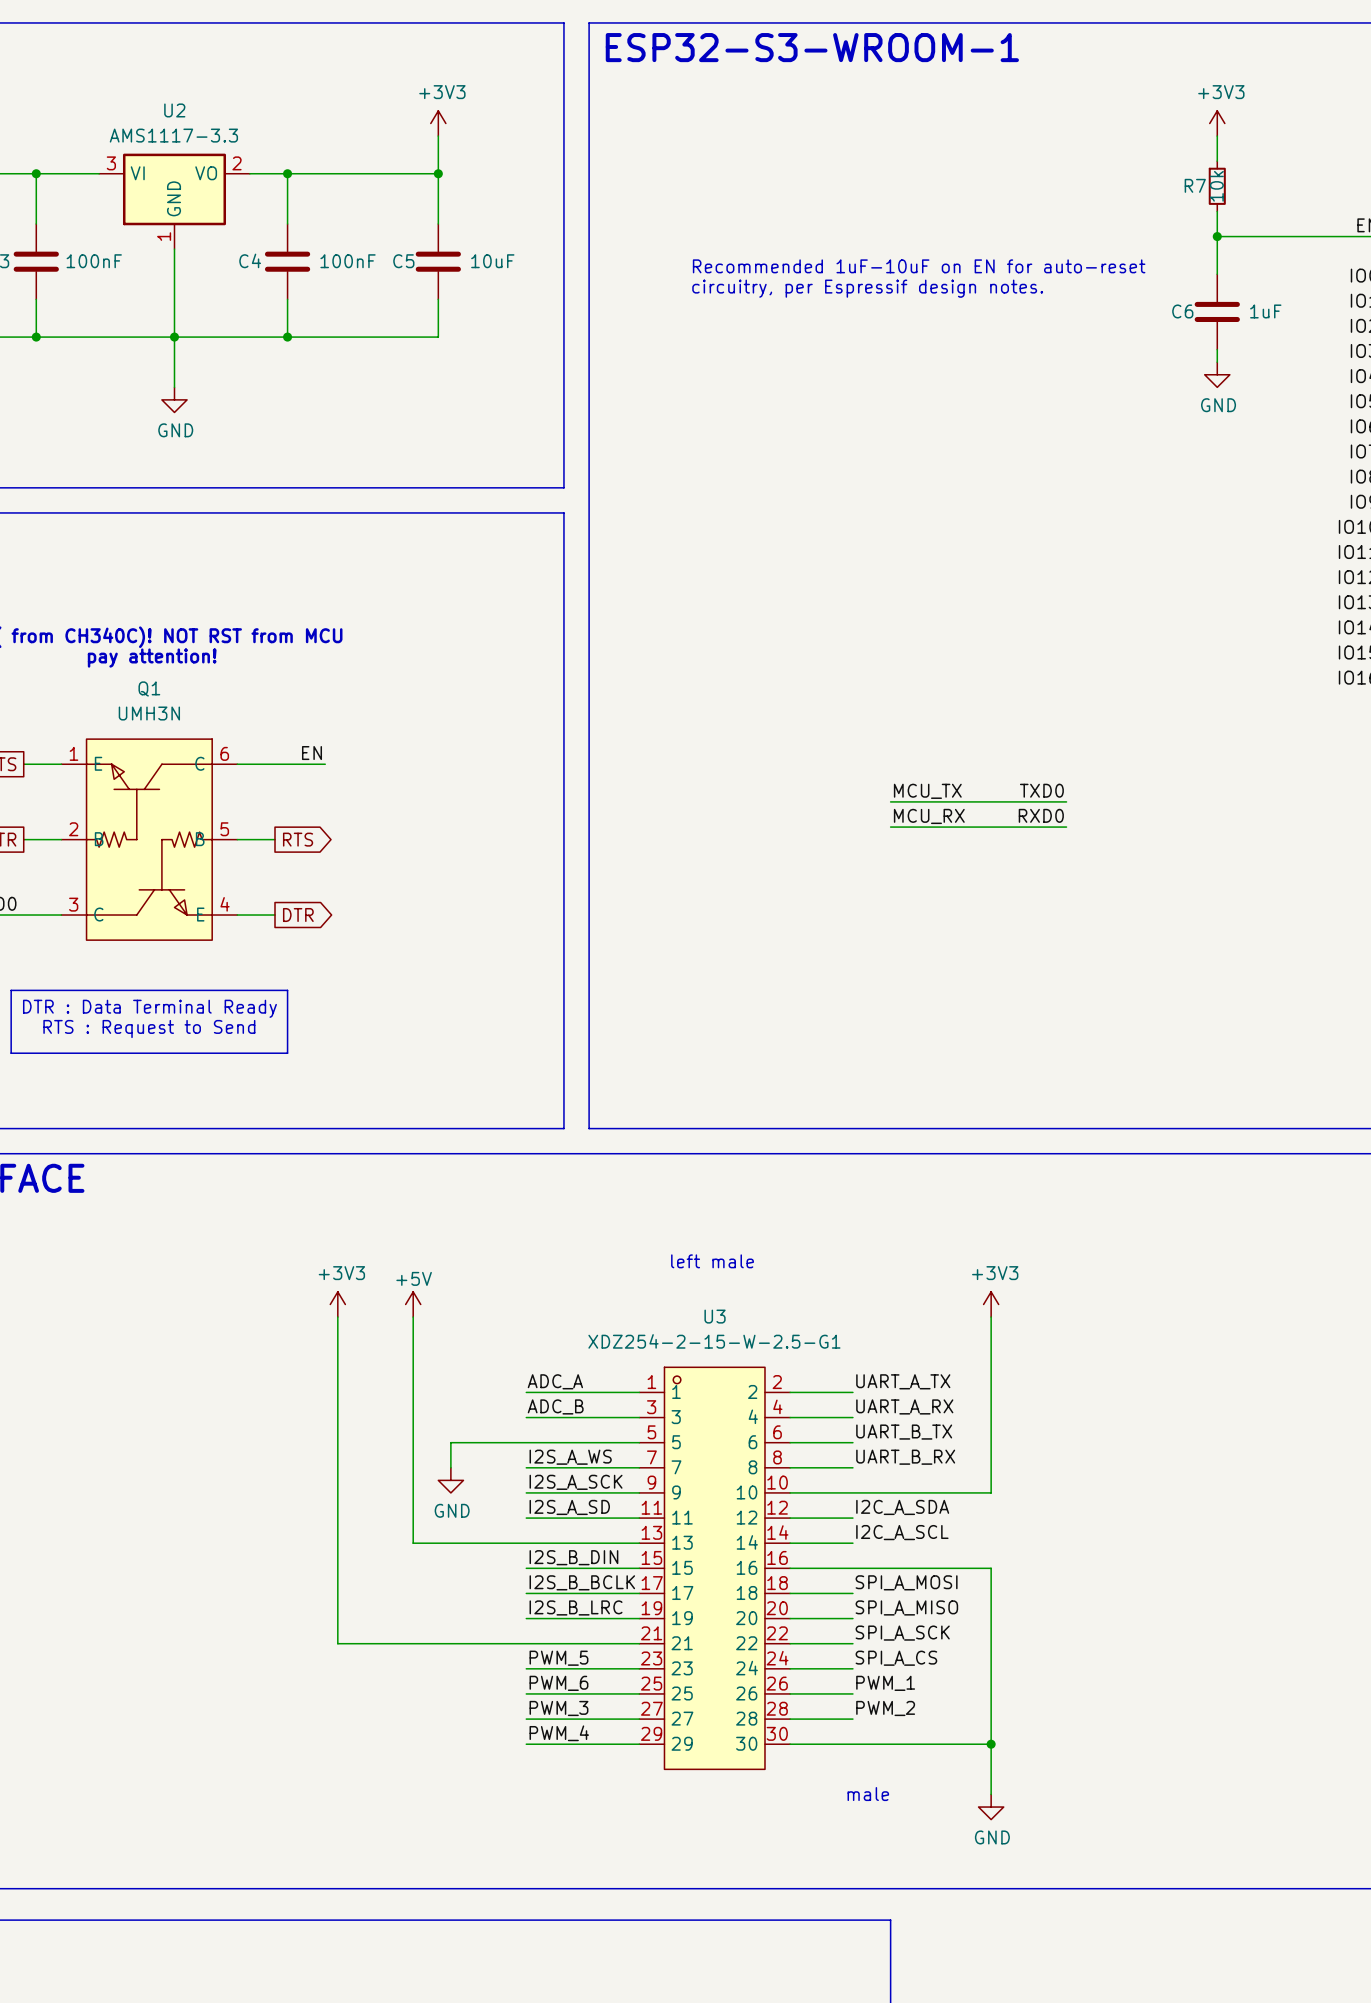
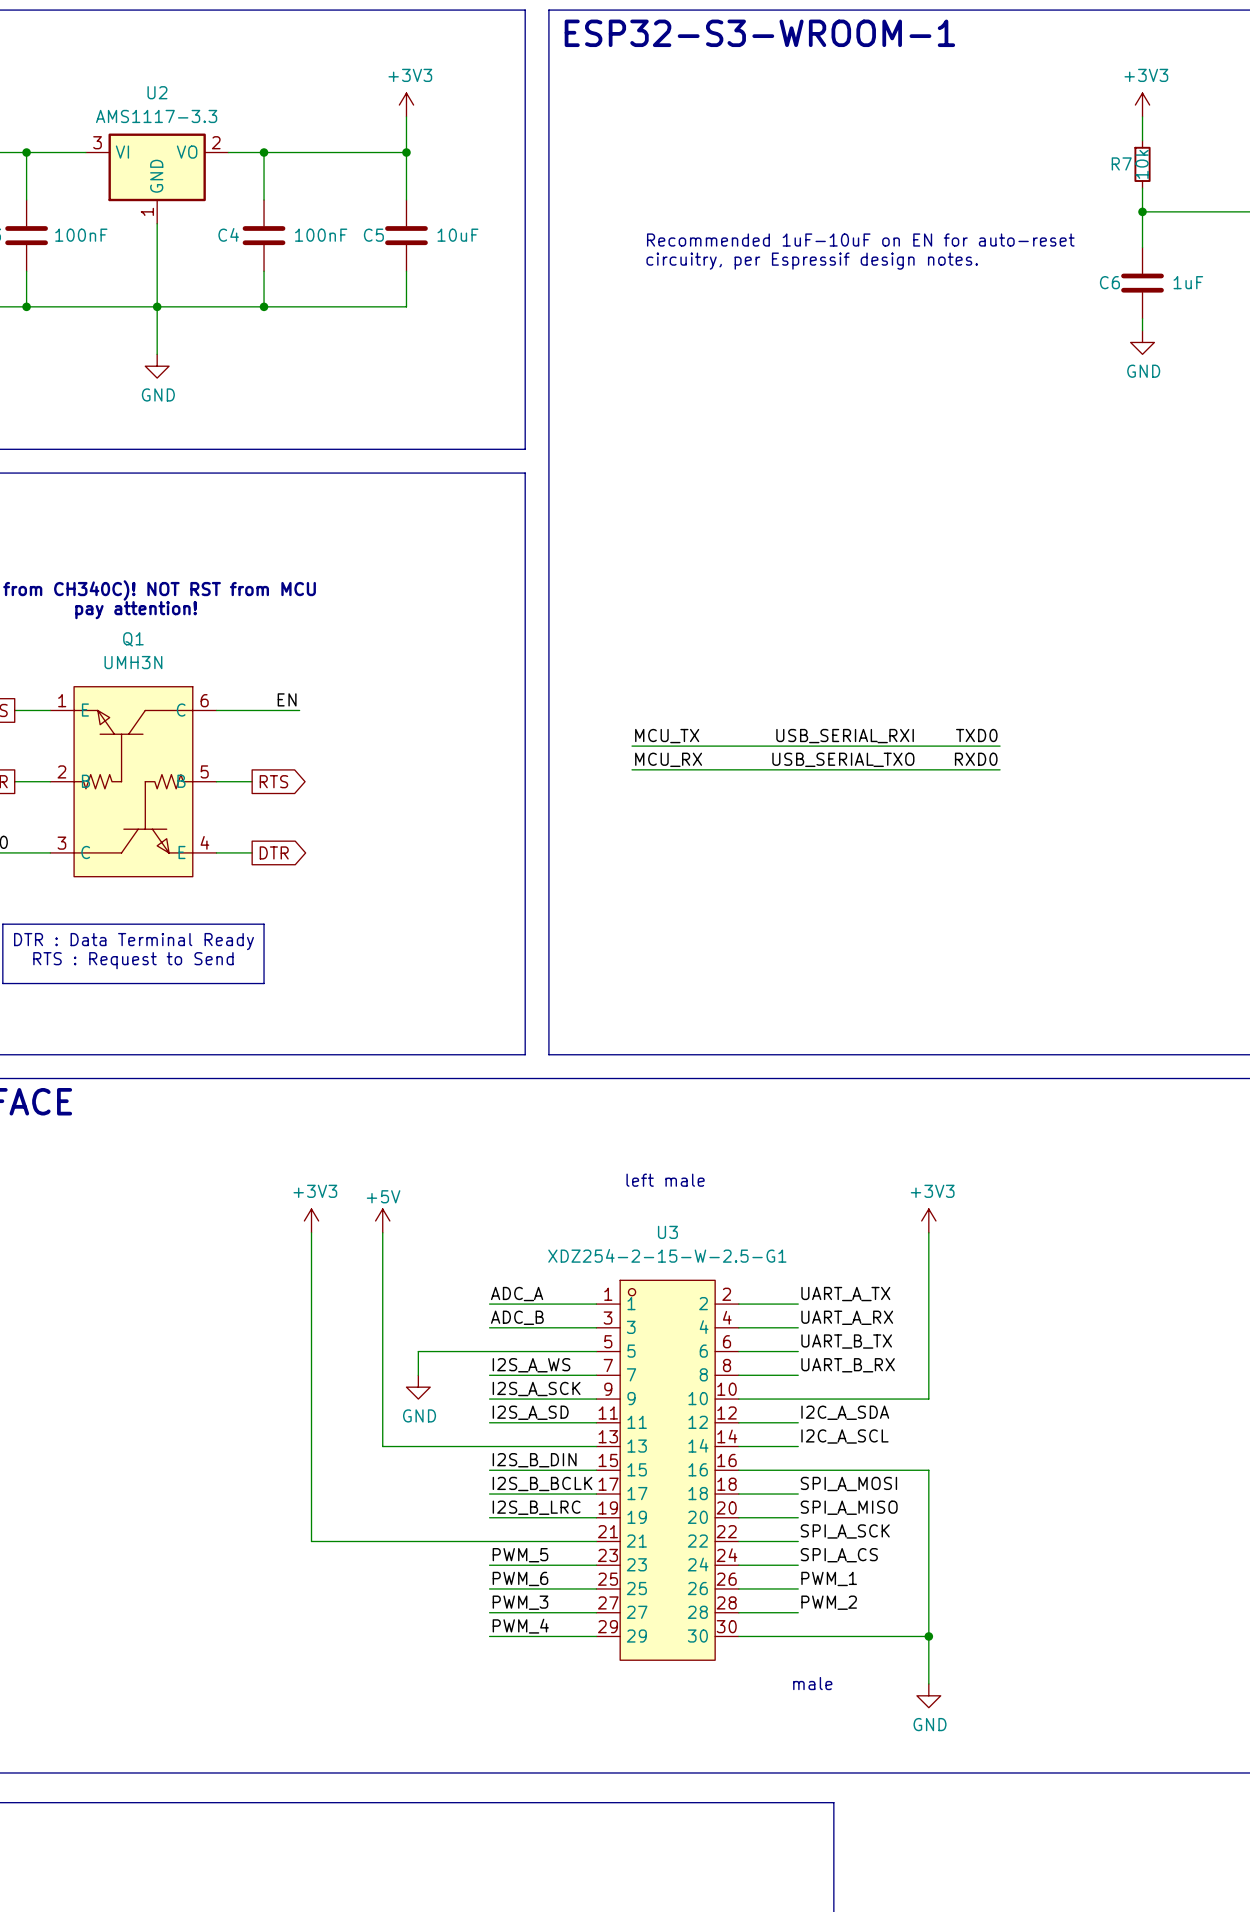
label: none -> USB_SERIAL_RXI (845, 736)
label position: MCU_TX (927, 791) -> MCU_TX (667, 736)
wire: none -> (632, 746) (833, 746)
label: none -> USB_SERIAL_TXO (843, 759)
label position: MCU_RX (929, 816) -> MCU_RX (668, 759)
wire: none -> (632, 769) (833, 769)

